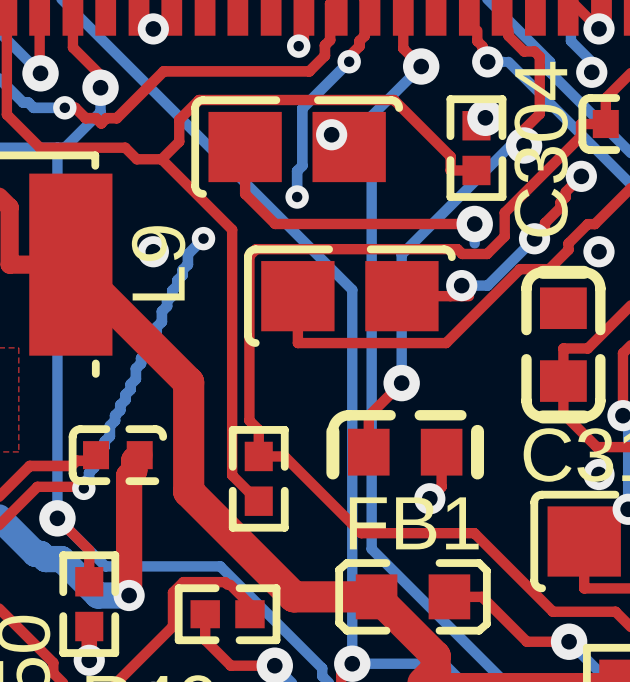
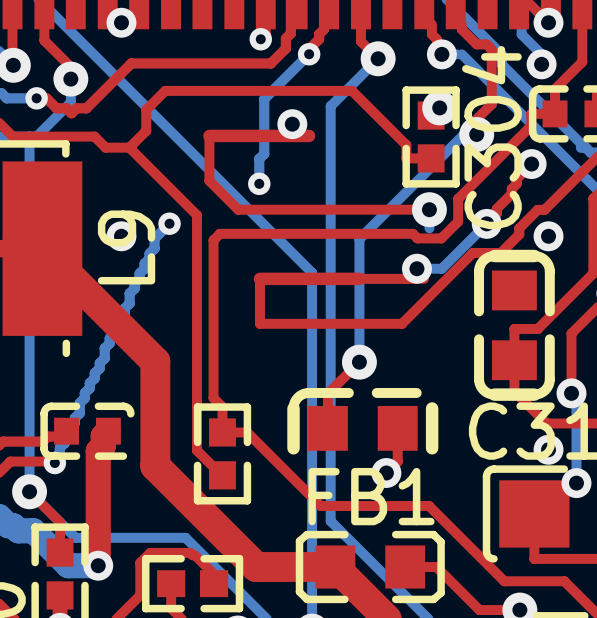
top track: none -> (209, 135) (309, 135)
part: (297, 147) -> none
top track: none -> (259, 278) (359, 278)
part: (349, 296) -> none

